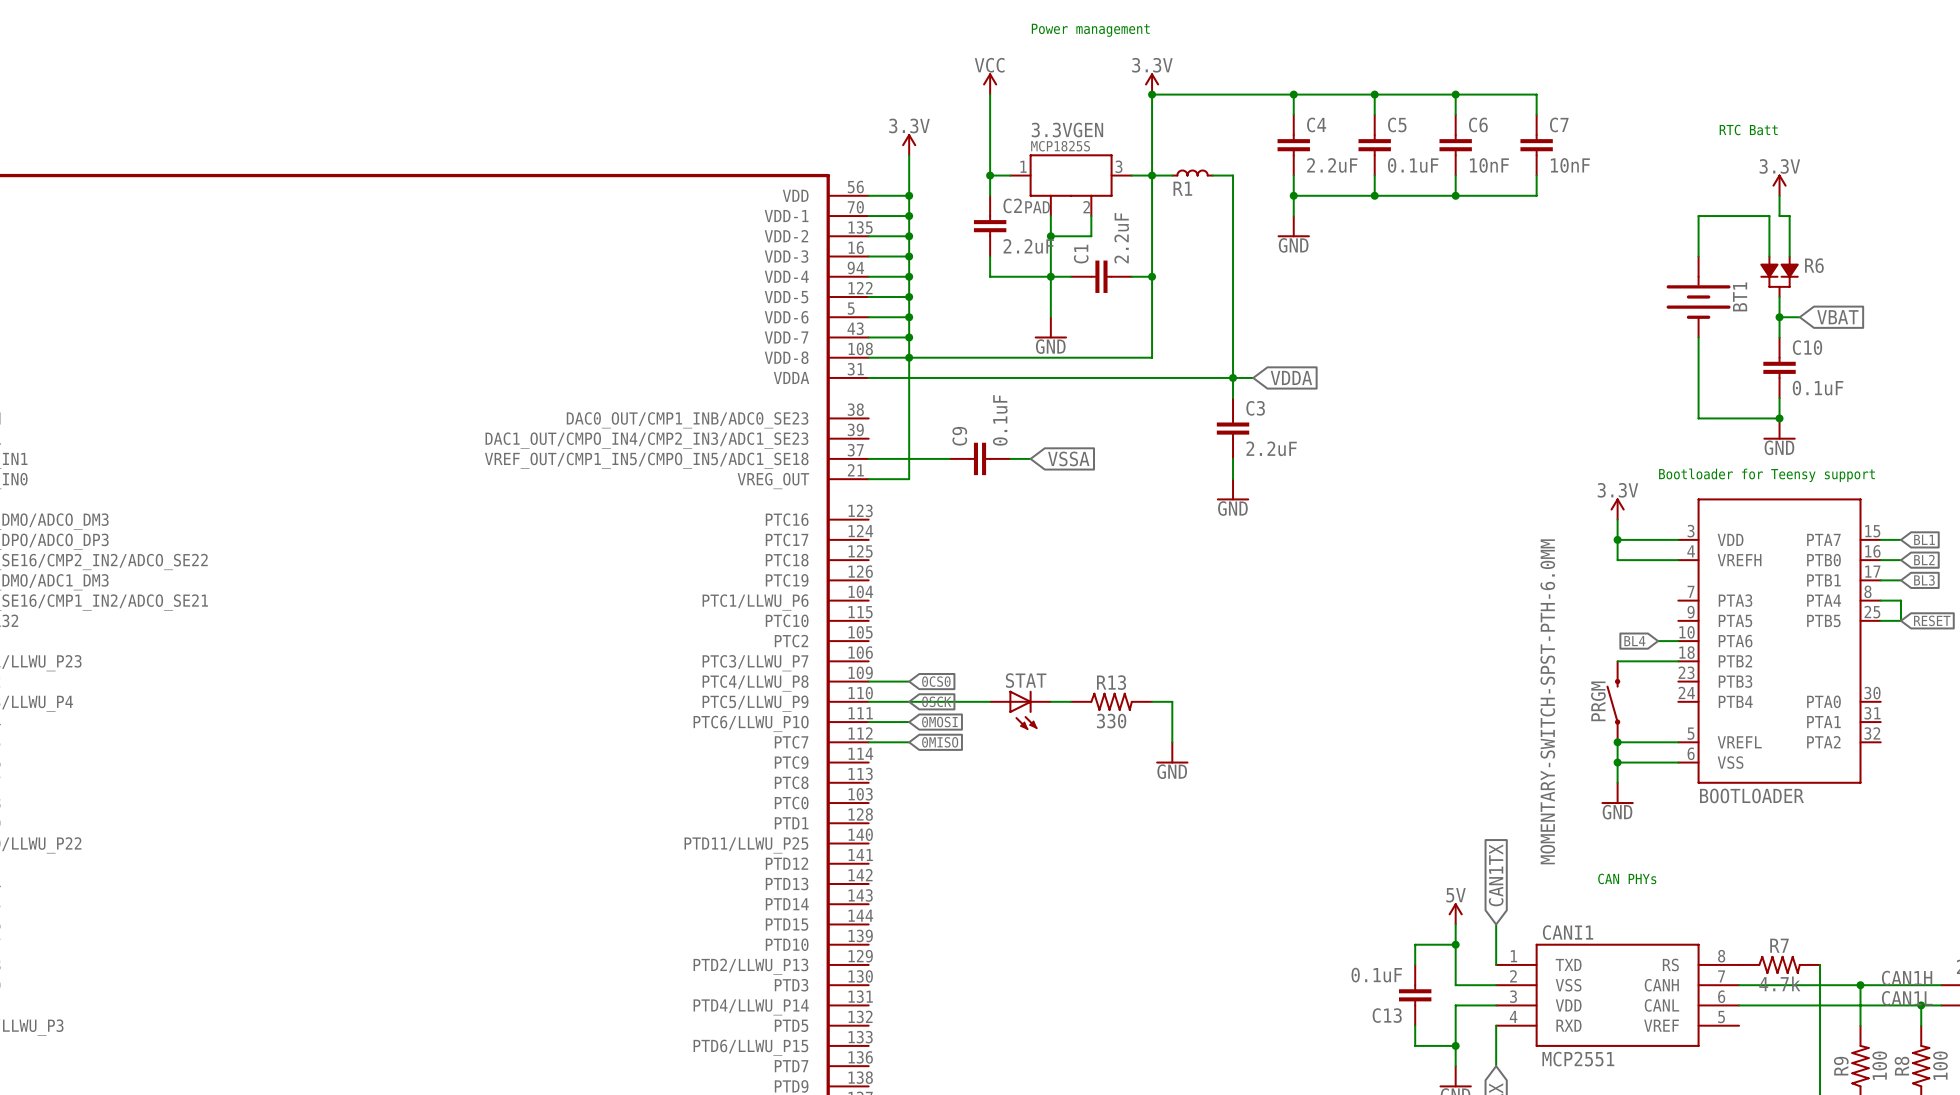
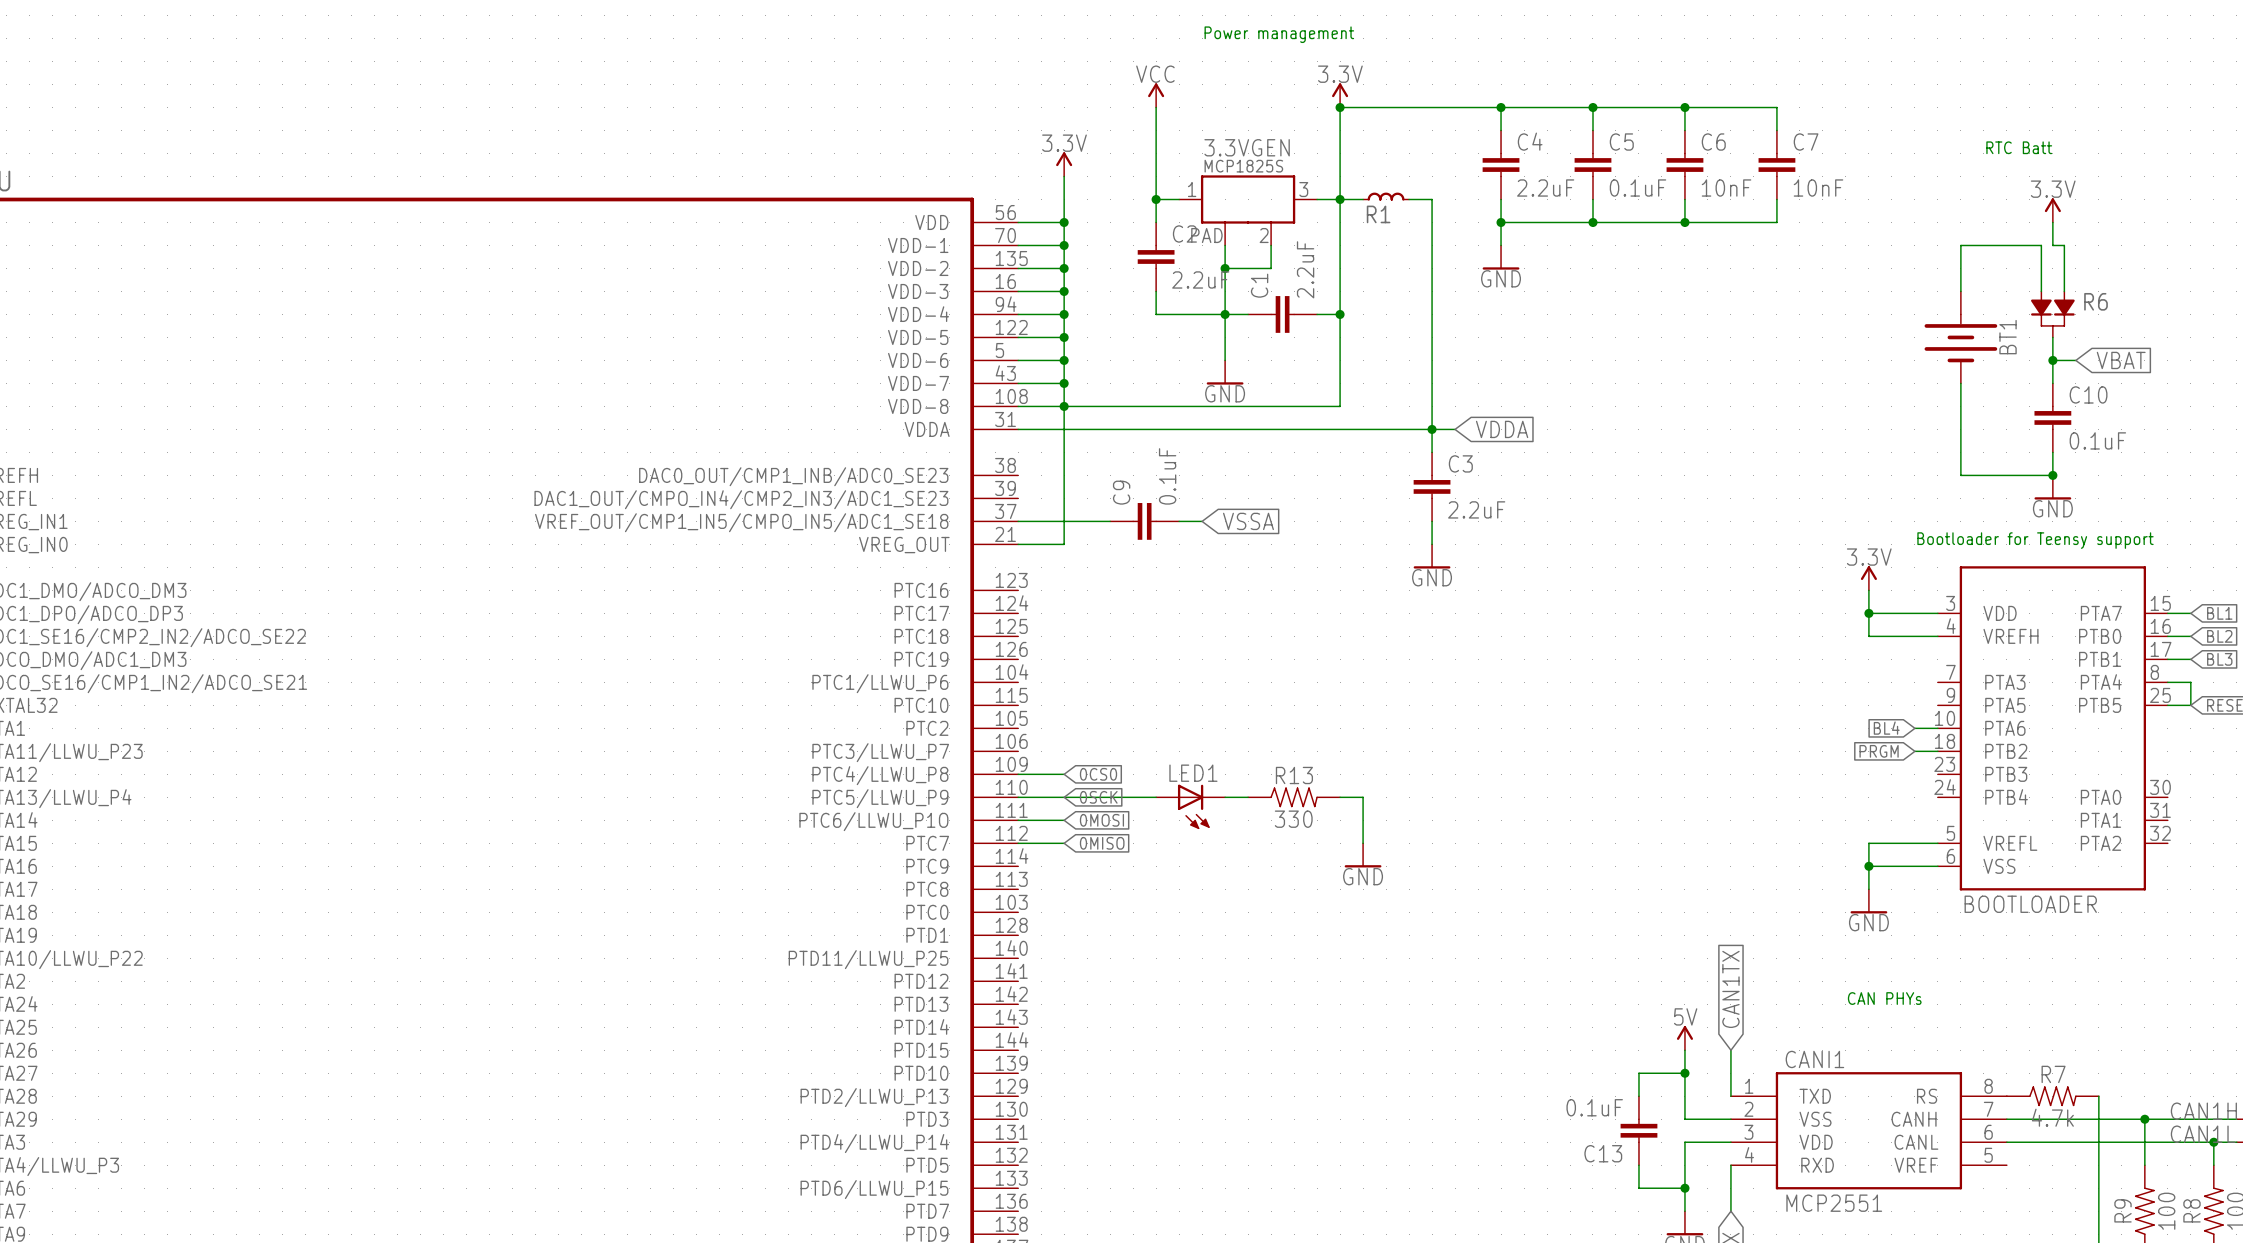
wire: (1617, 661) (1658, 661) -> none
global label: none -> PRGM (1879, 751)
STAT name: STAT (1026, 680) -> LED1 (1193, 773)
PRGM: MOMENTARY-SWITCH-SPST-PTH-6.0MM (1613, 701) -> none
junction: (1617, 742) -> none

